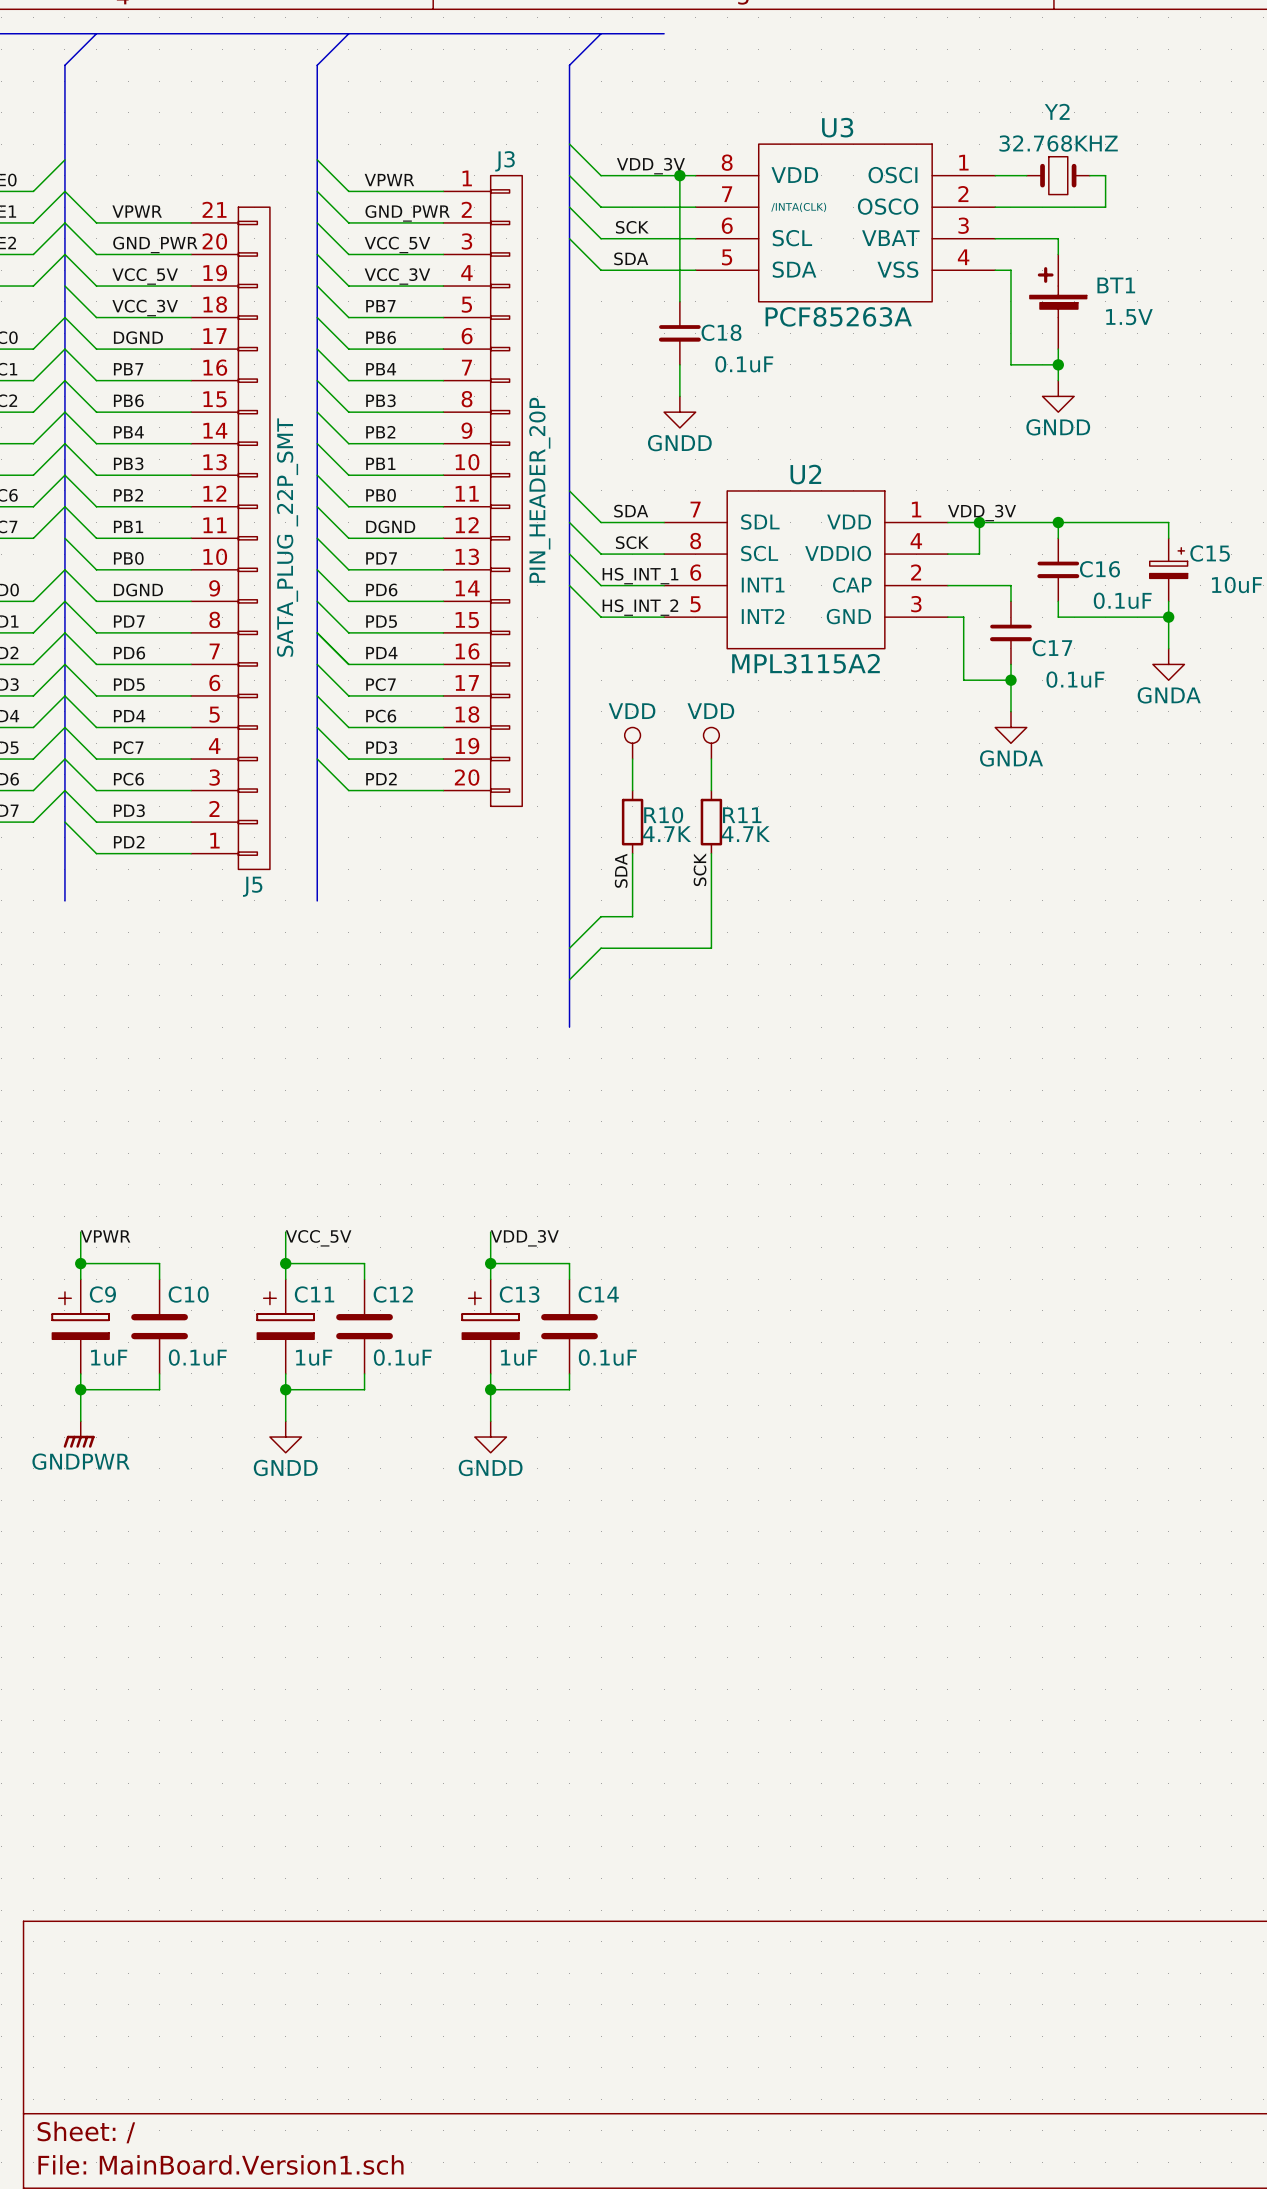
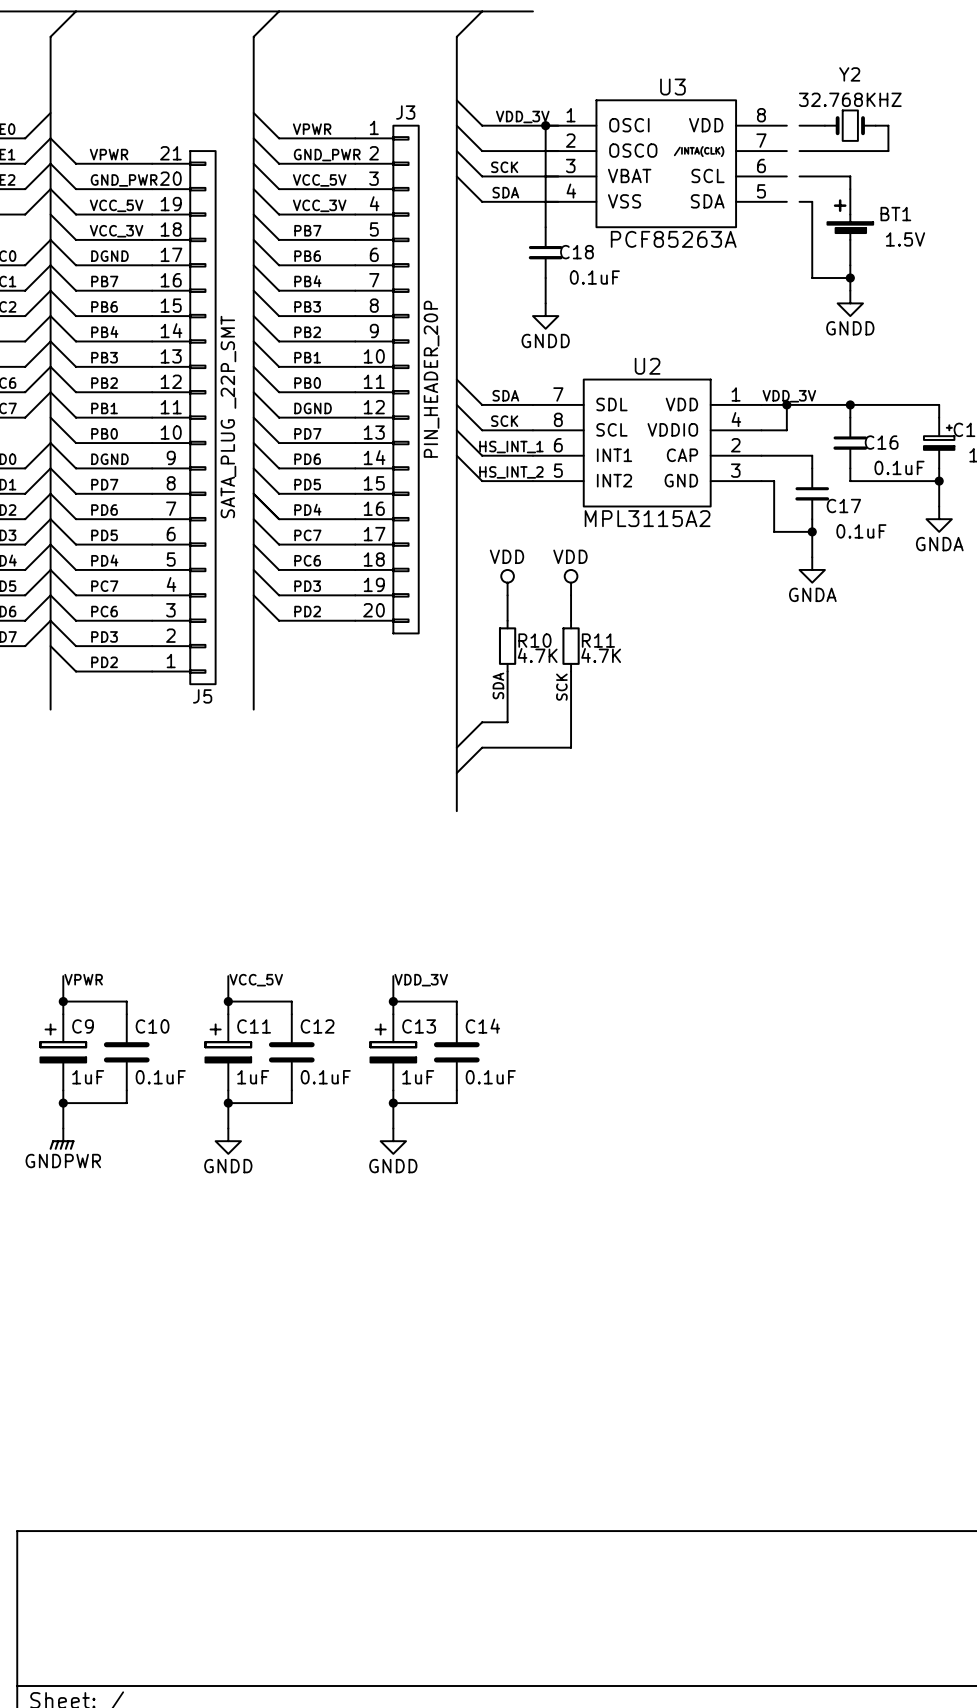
U3 flip: as is (845, 222) -> left-right (666, 163)

